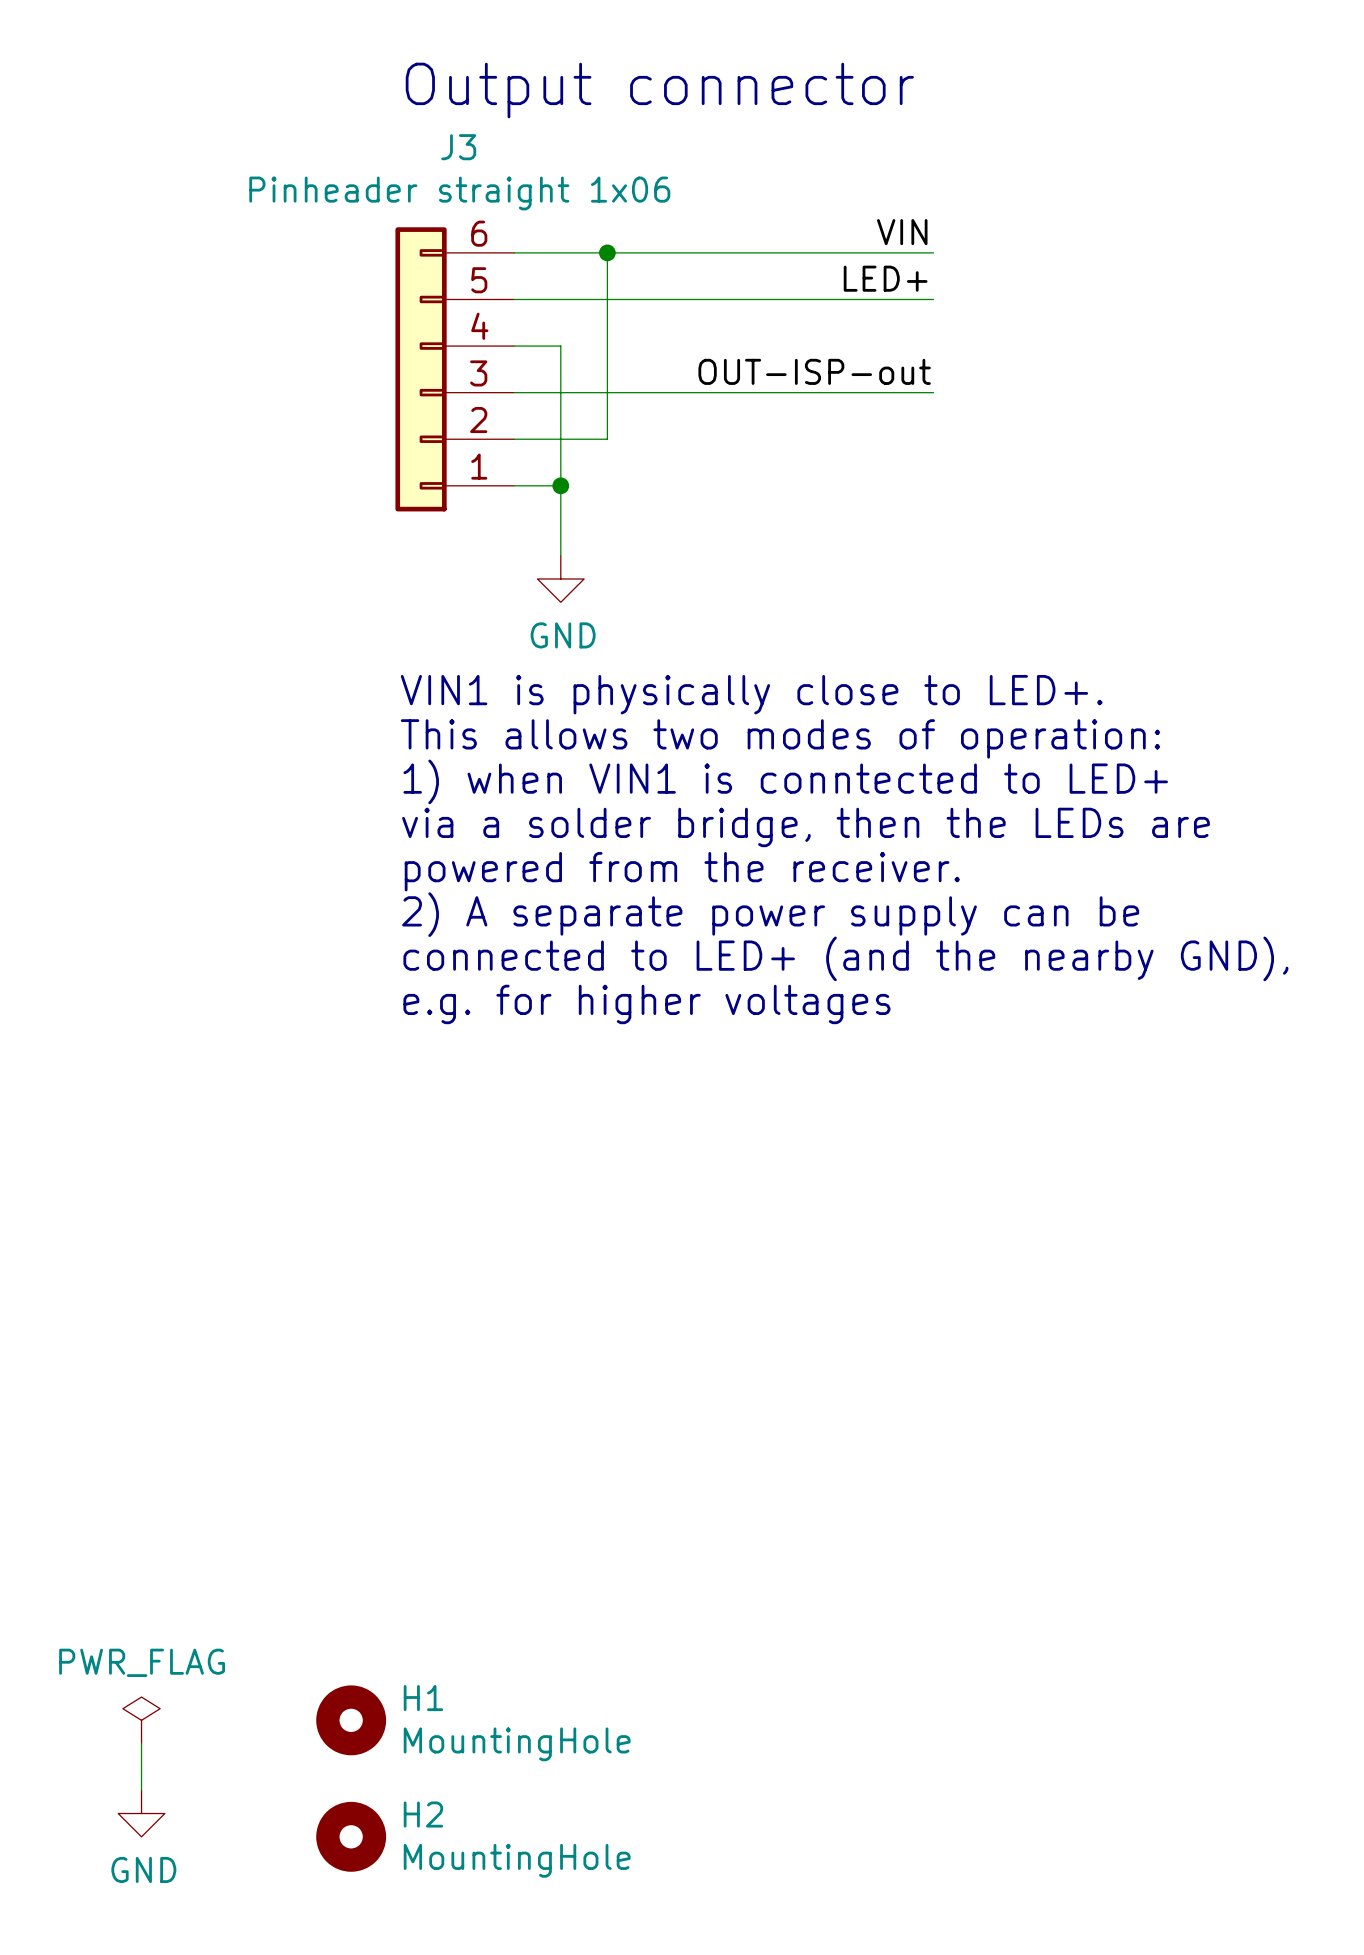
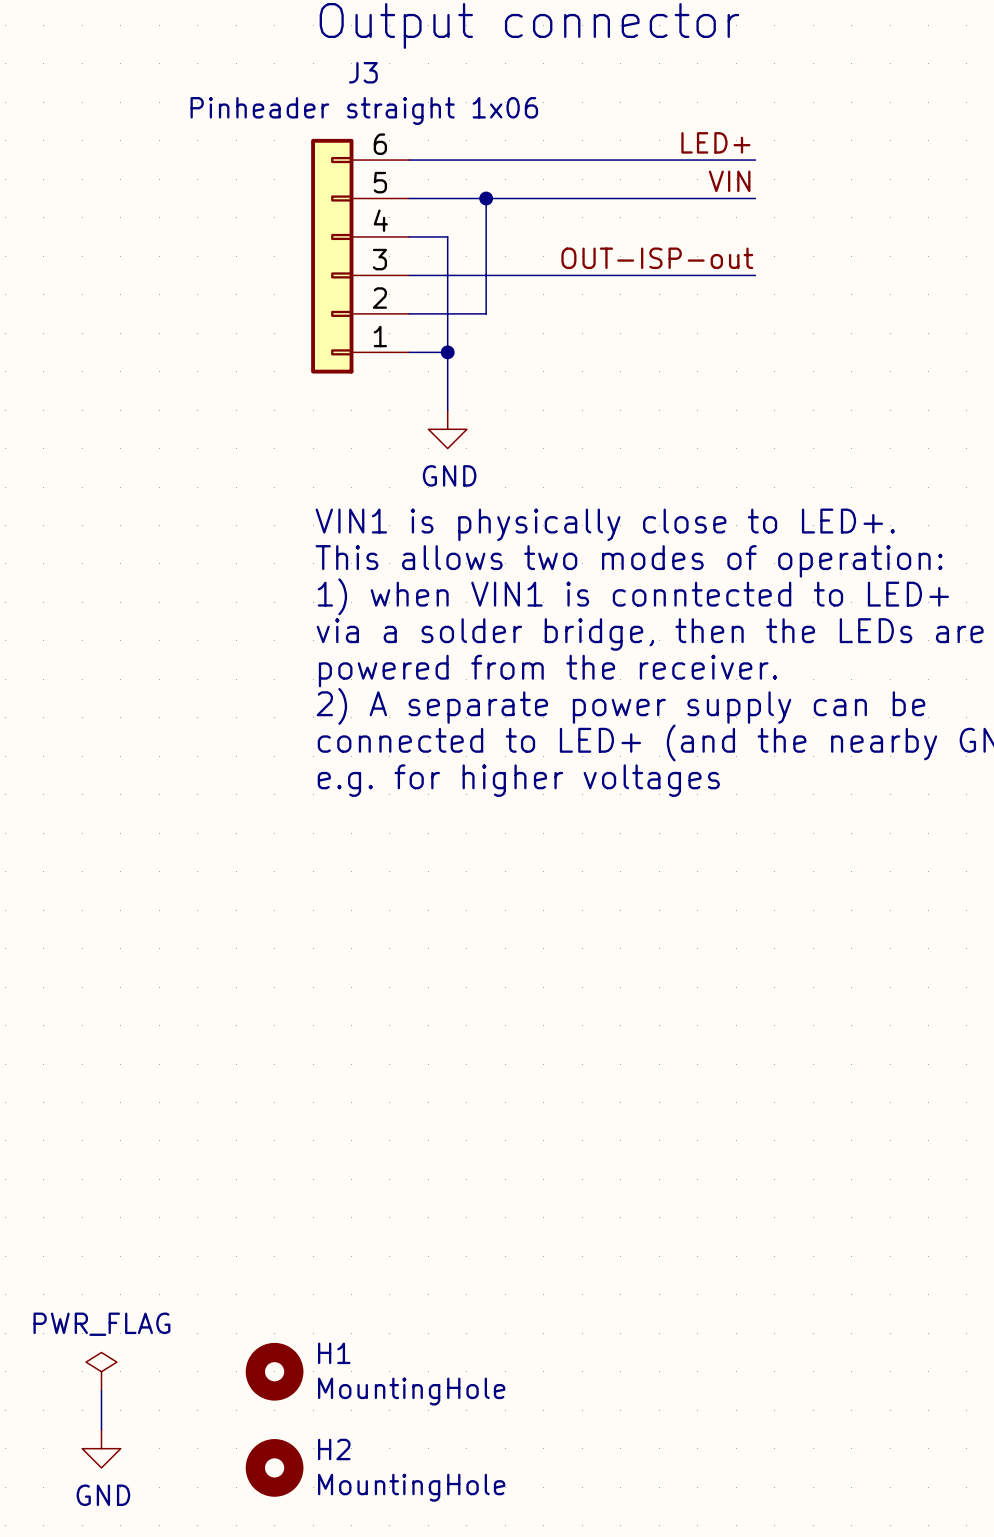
label: VIN (902, 232) -> LED+ (715, 142)
wire: (607, 252) (607, 299) -> none
junction position: (607, 252) -> (486, 198)
label: LED+ (885, 278) -> VIN (729, 181)

